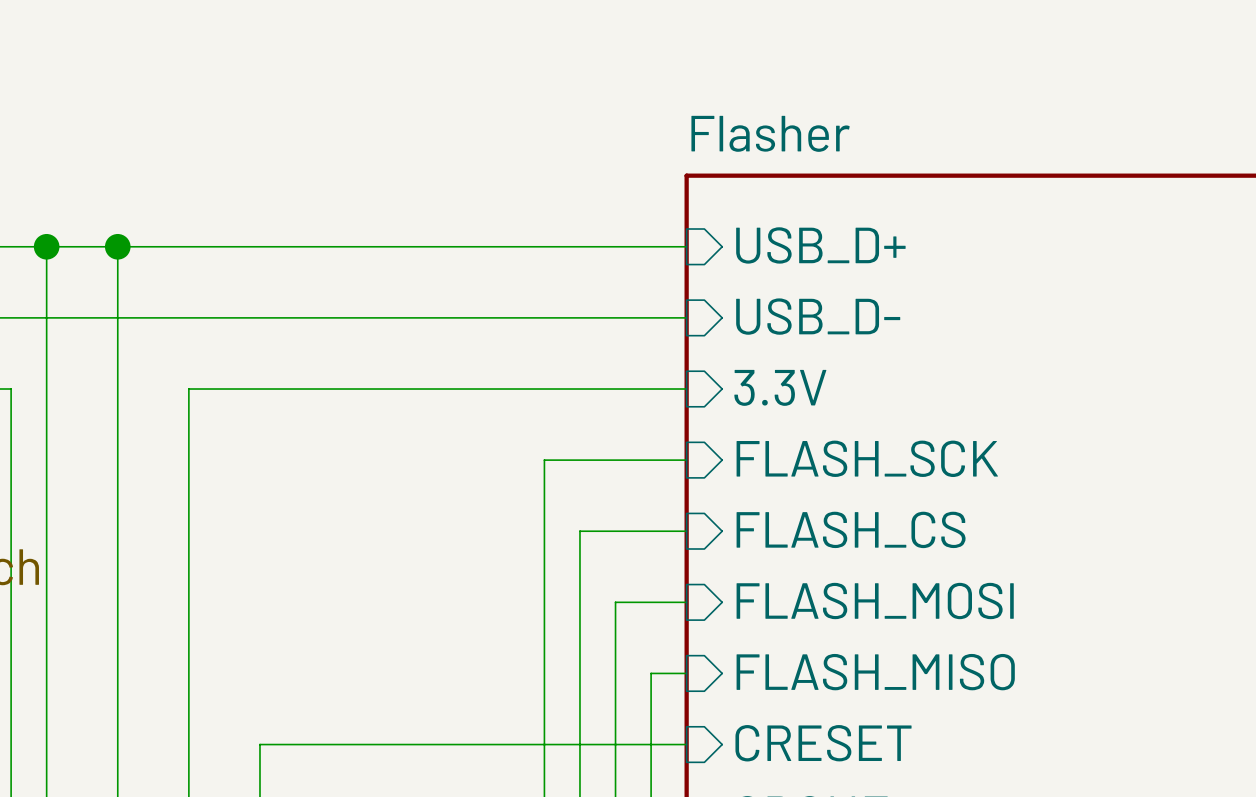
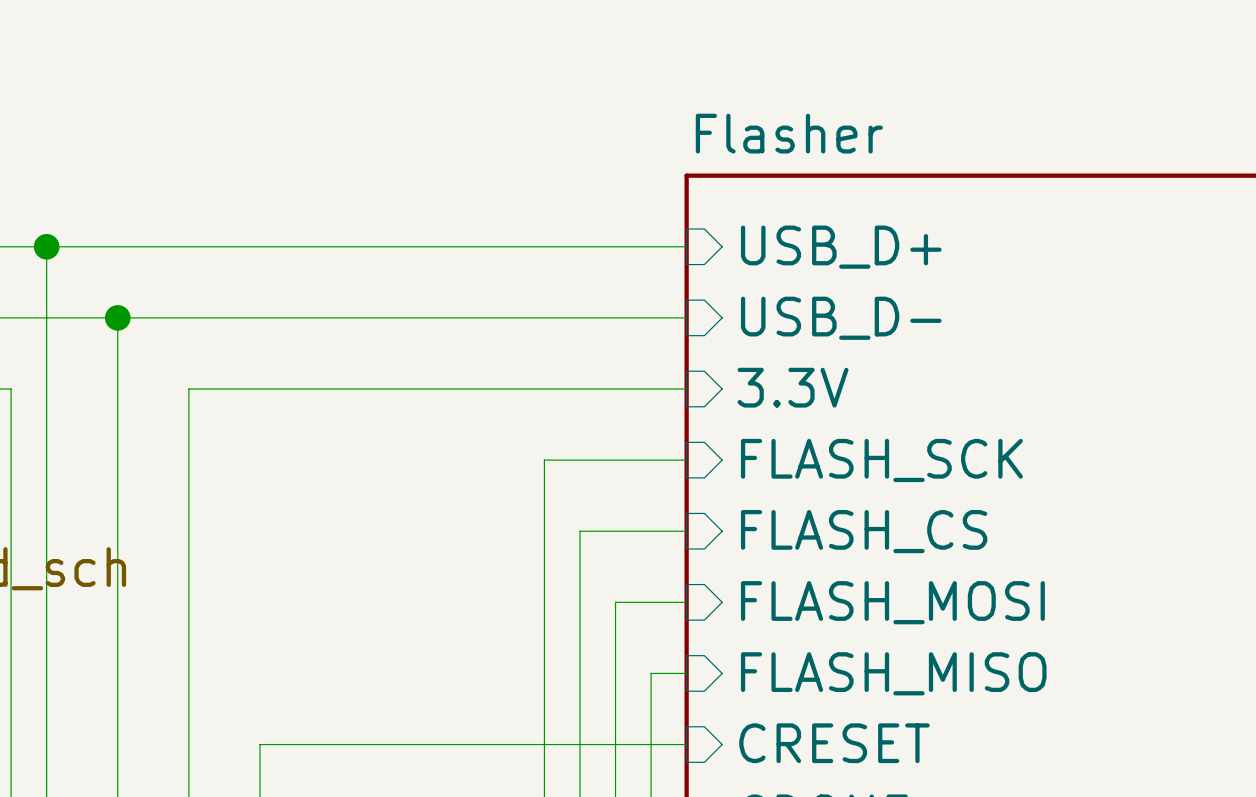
wire: (117, 246) (117, 317) -> none
junction position: (117, 246) -> (117, 317)

